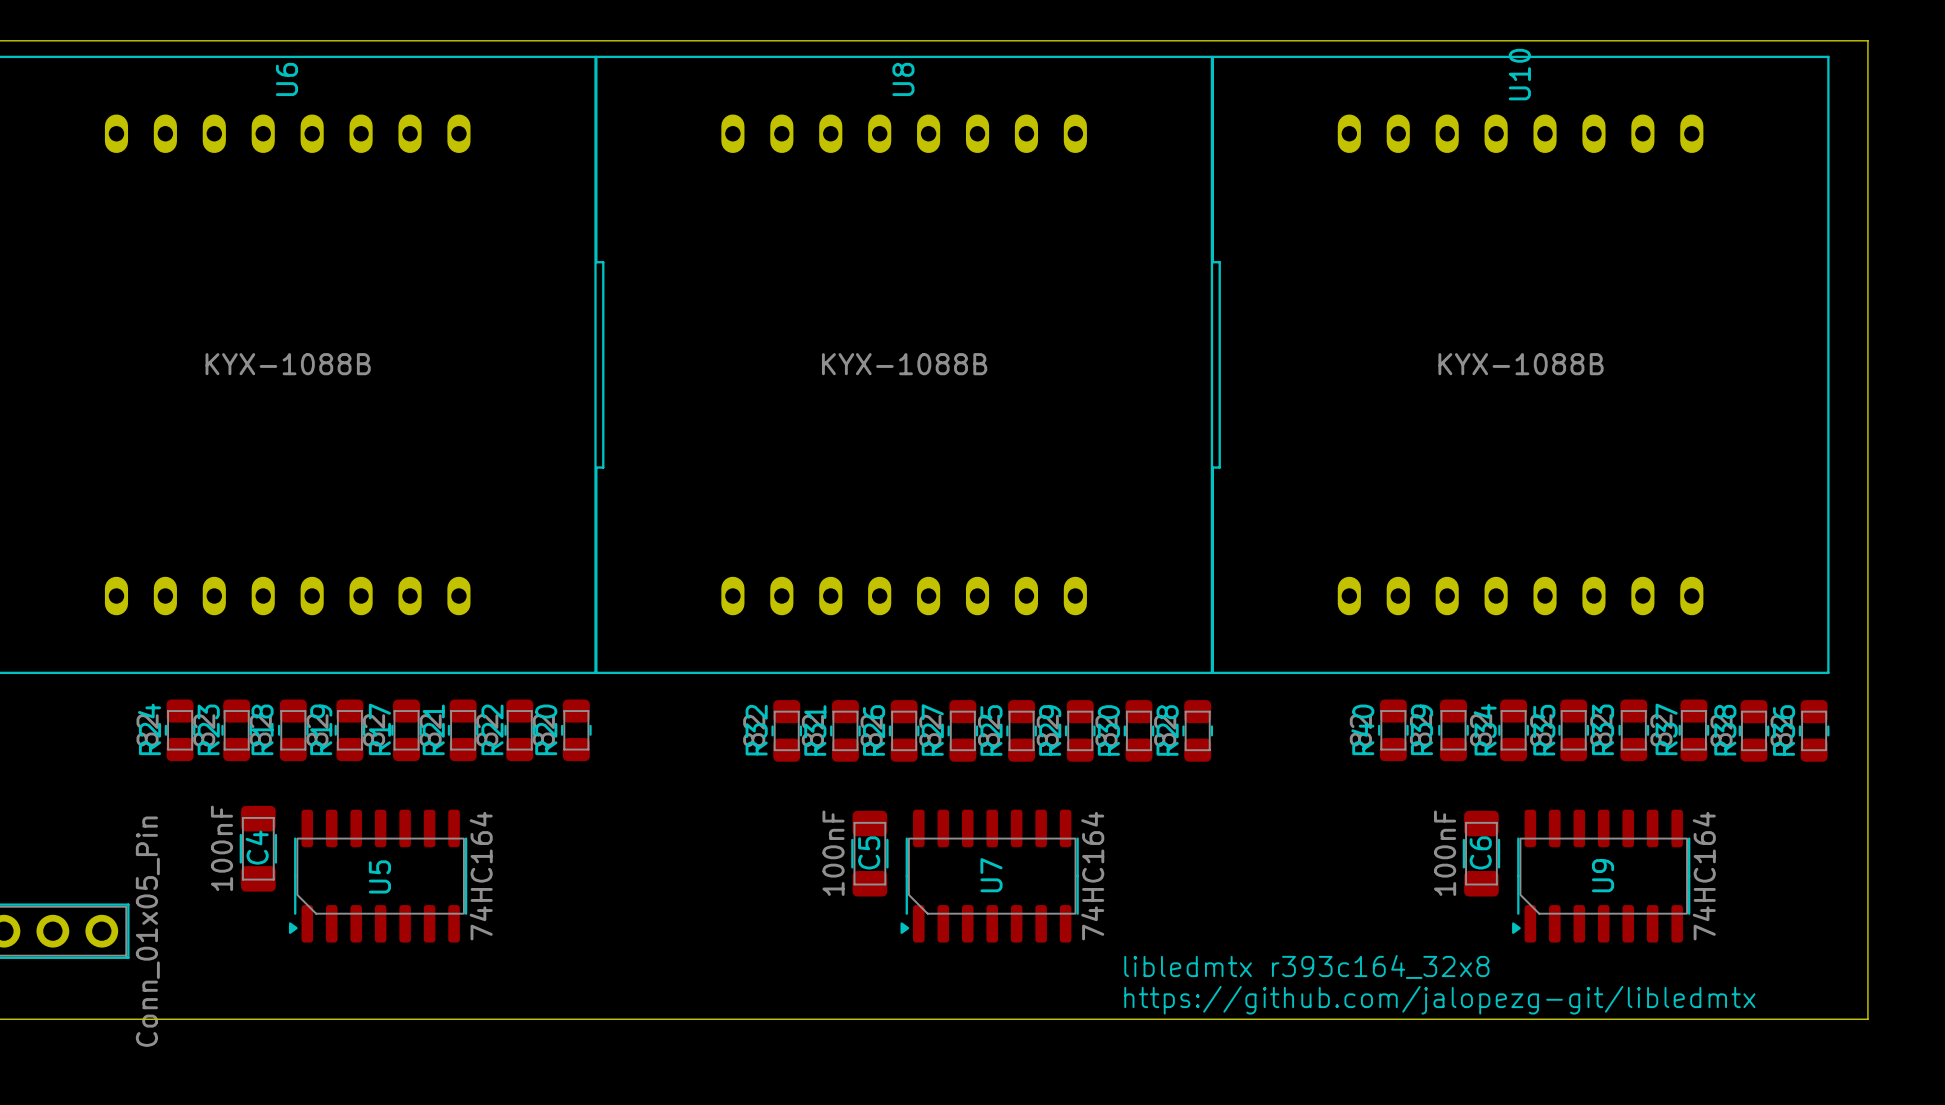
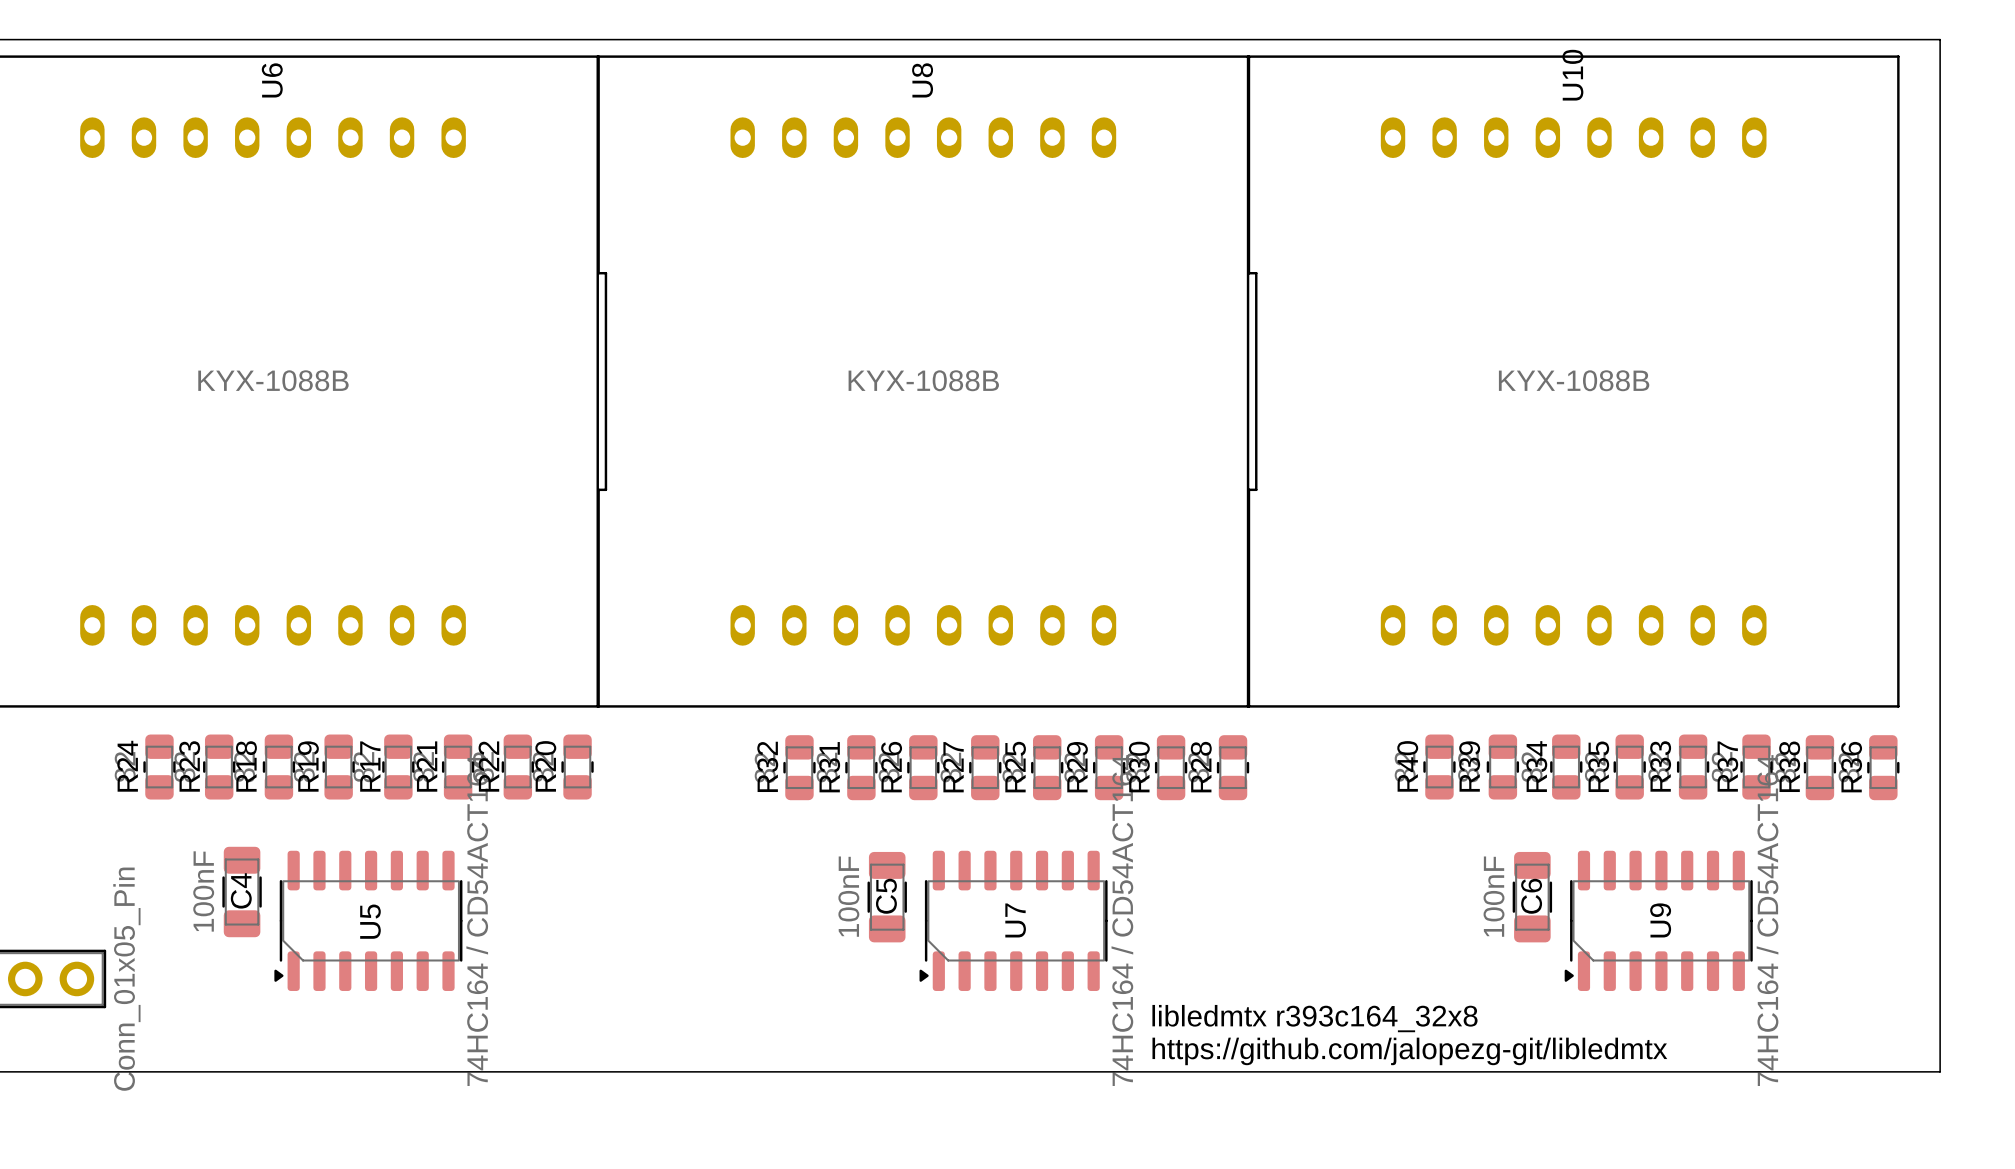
U5 value: 74HC164 (481, 876) -> 74HC164 / CD54ACT164 (477, 920)
U7 value: 74HC164 (1092, 876) -> 74HC164 / CD54ACT164 (1122, 920)
U9 value: 74HC164 (1704, 876) -> 74HC164 / CD54ACT164 (1767, 920)

